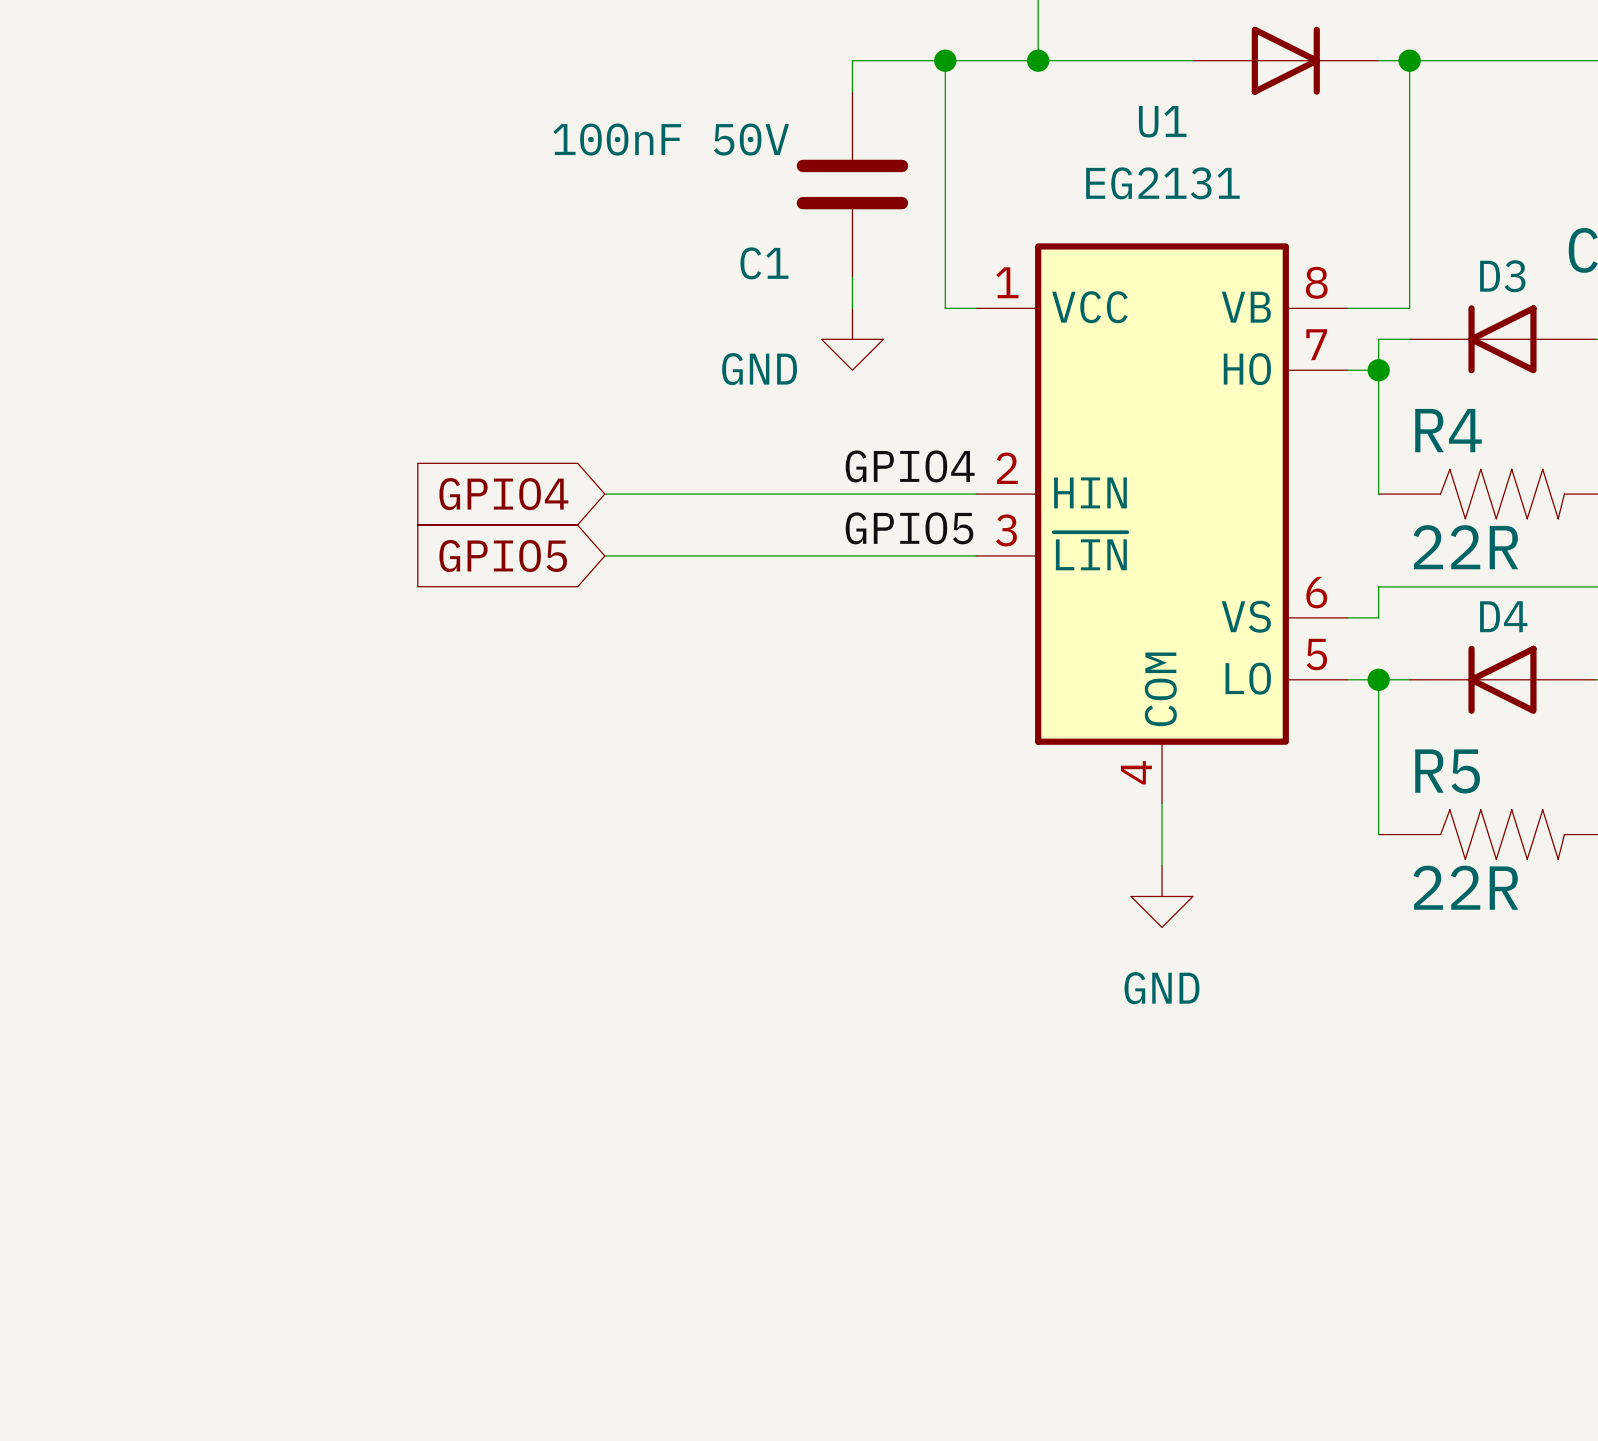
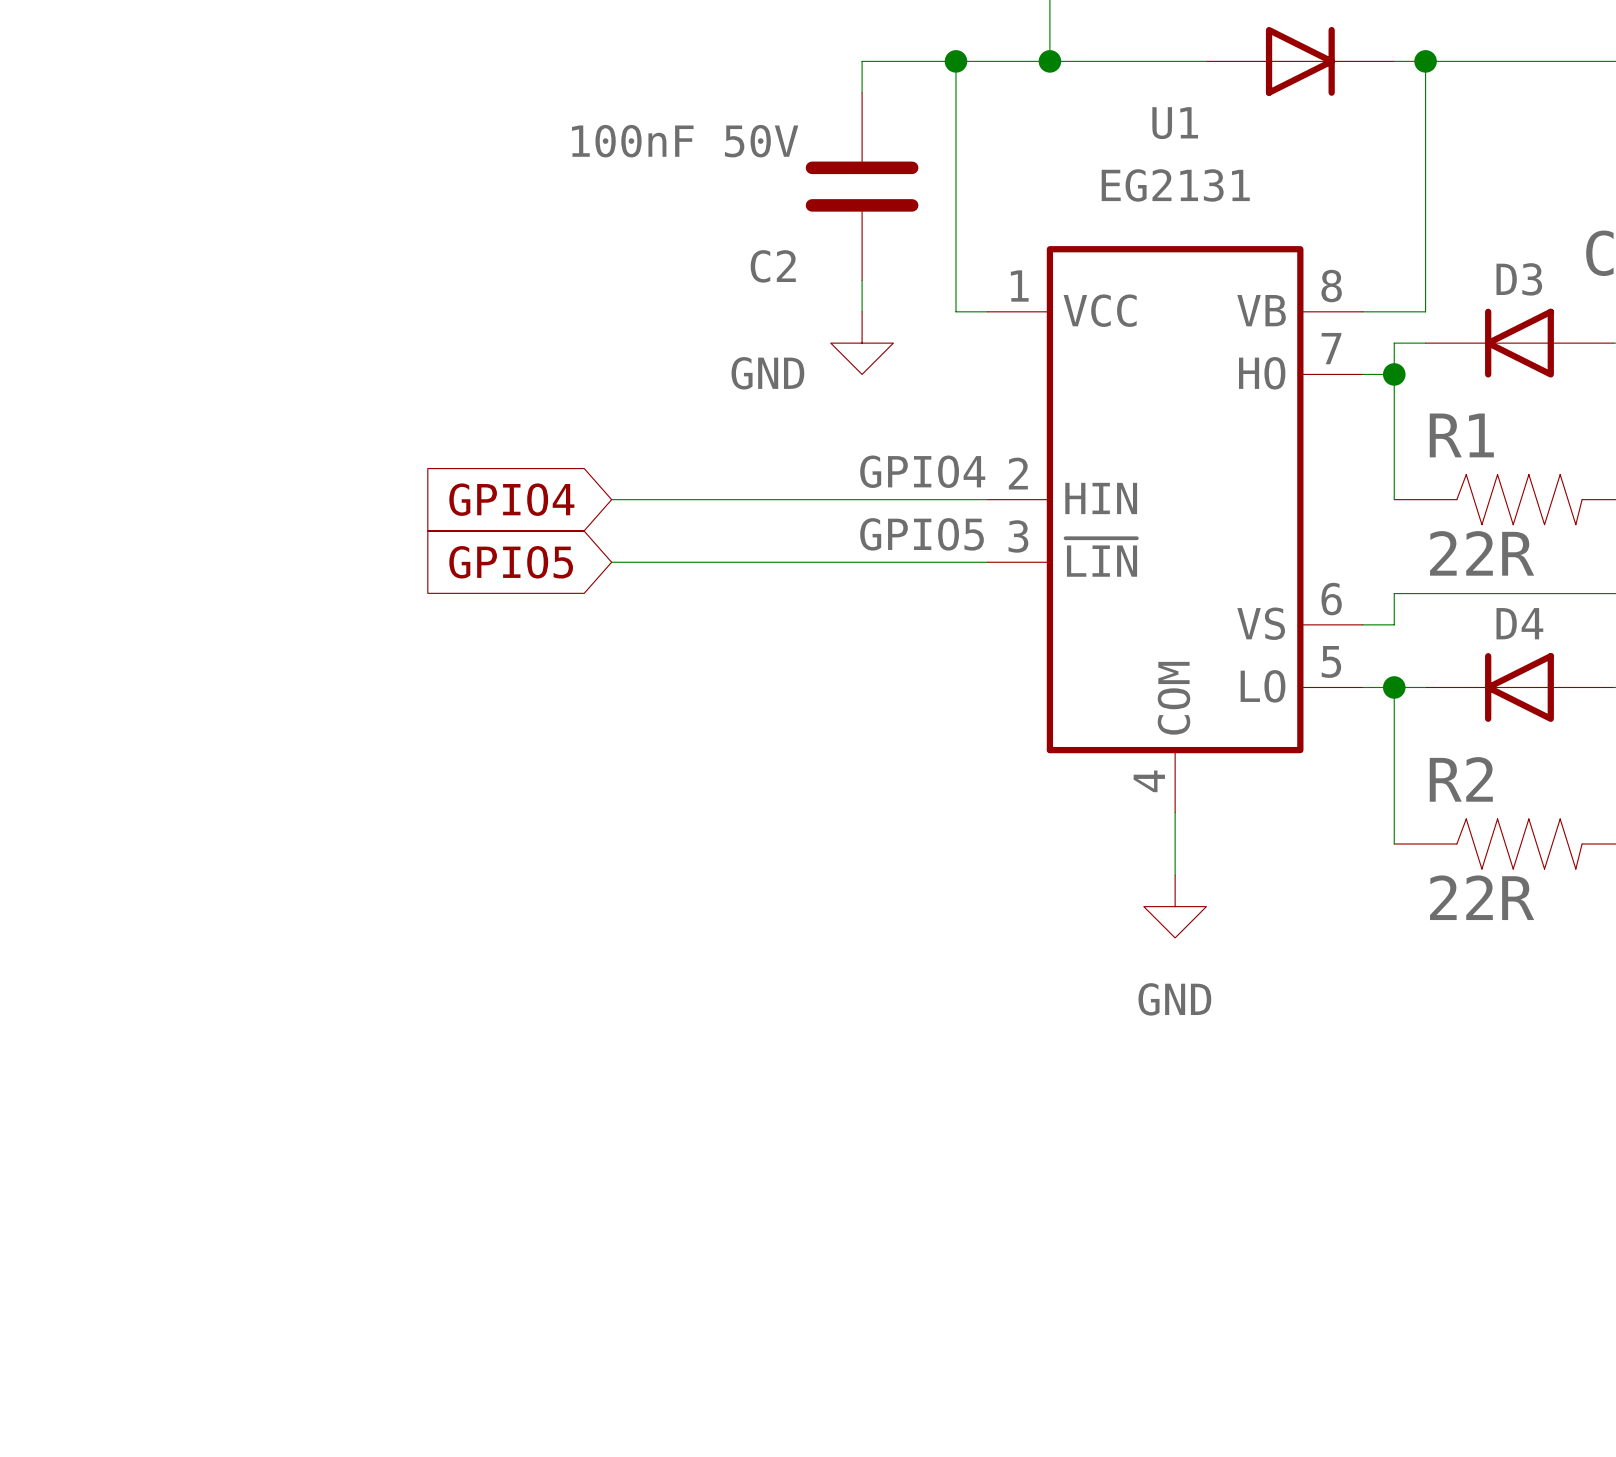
C1 name: C1 (764, 263) -> C2 (773, 266)
R4 name: R4 (1448, 430) -> R1 (1461, 435)
R5 name: R5 (1447, 771) -> R2 (1461, 779)

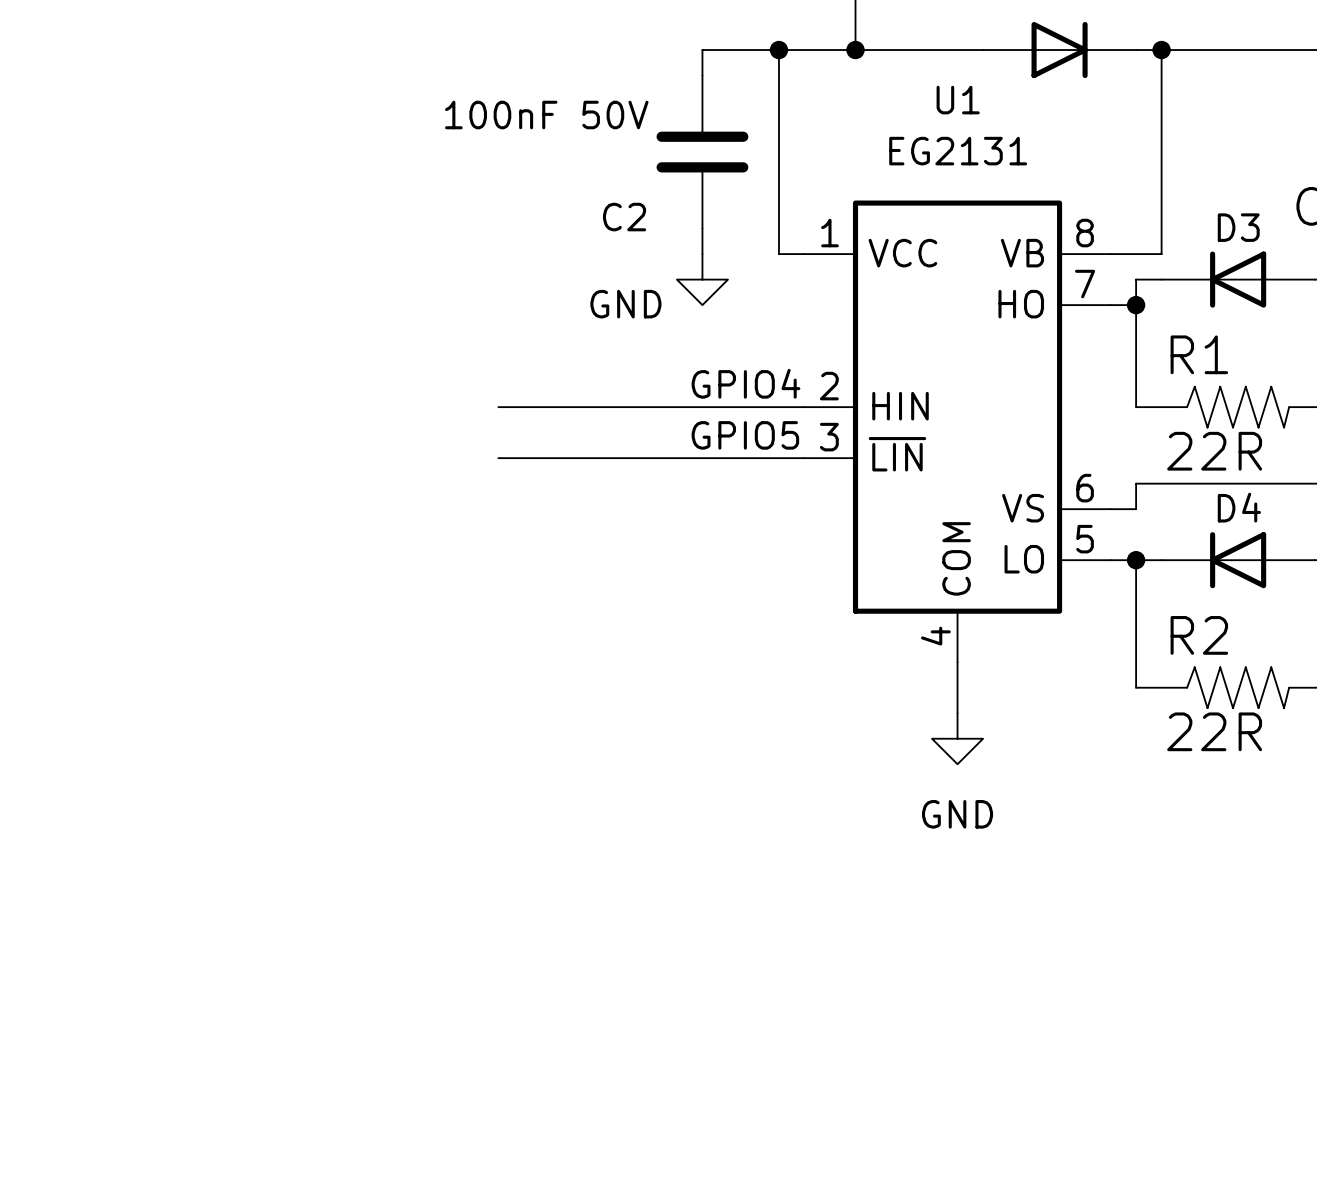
global label: GPIO4 (511, 499) -> none
global label: GPIO5 (511, 562) -> none

